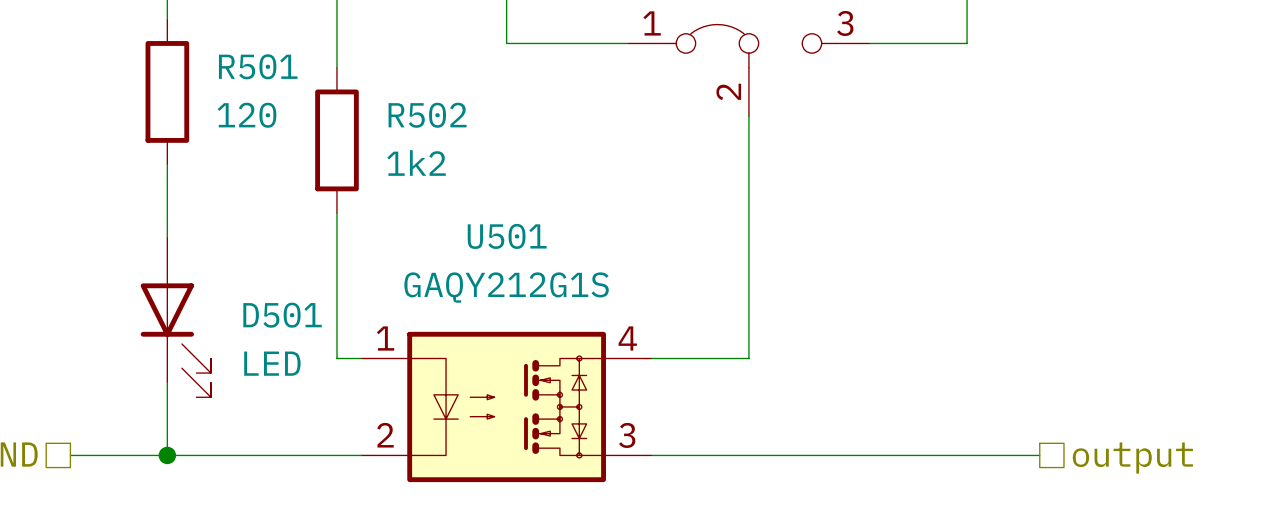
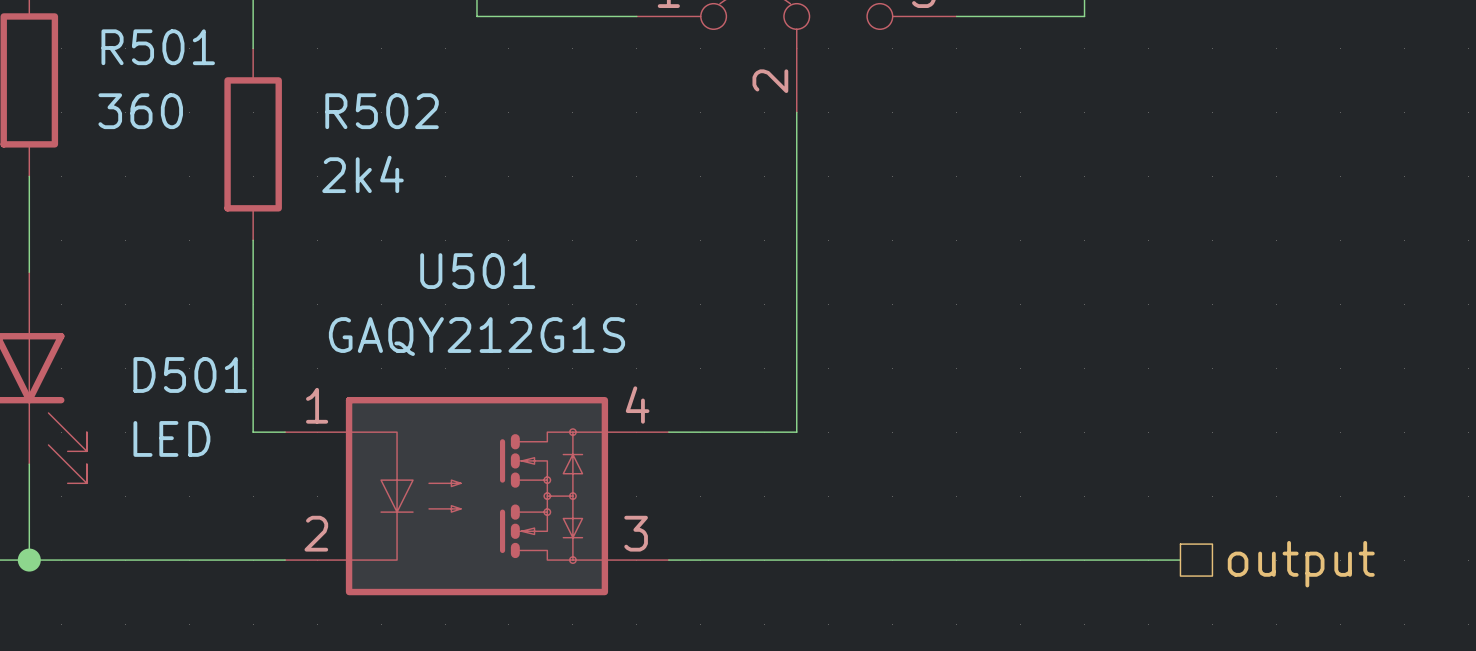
R501 value: 120 (247, 115) -> 360 (140, 111)
R502 value: 1k2 (416, 163) -> 2k4 (363, 174)

